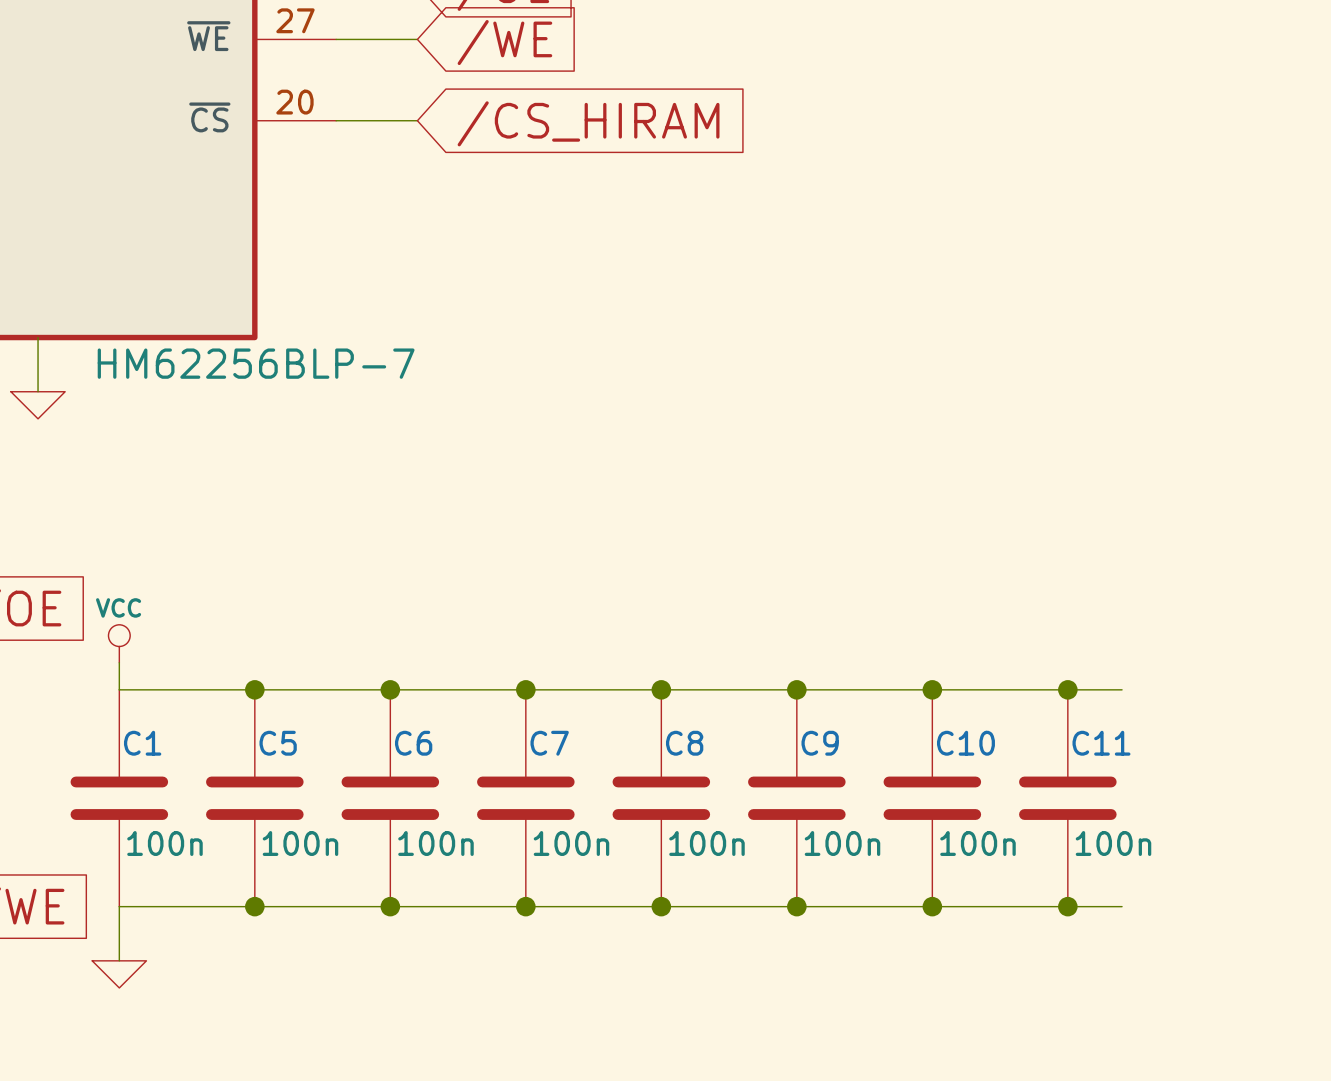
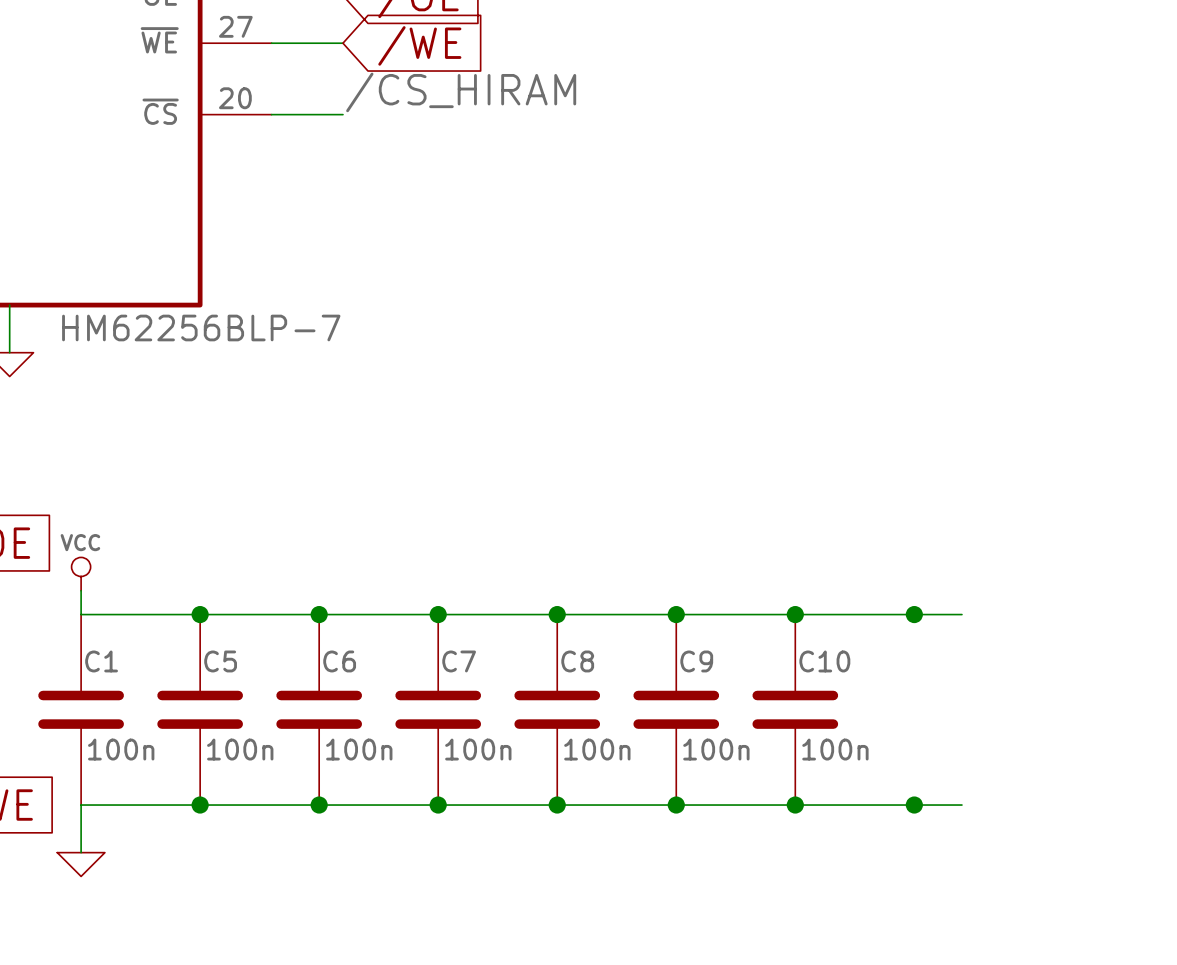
label: none -> /CS_HIRAM (461, 92)
global label: /CS_HIRAM (588, 123) -> none
C11: 100n (1067, 798) -> none

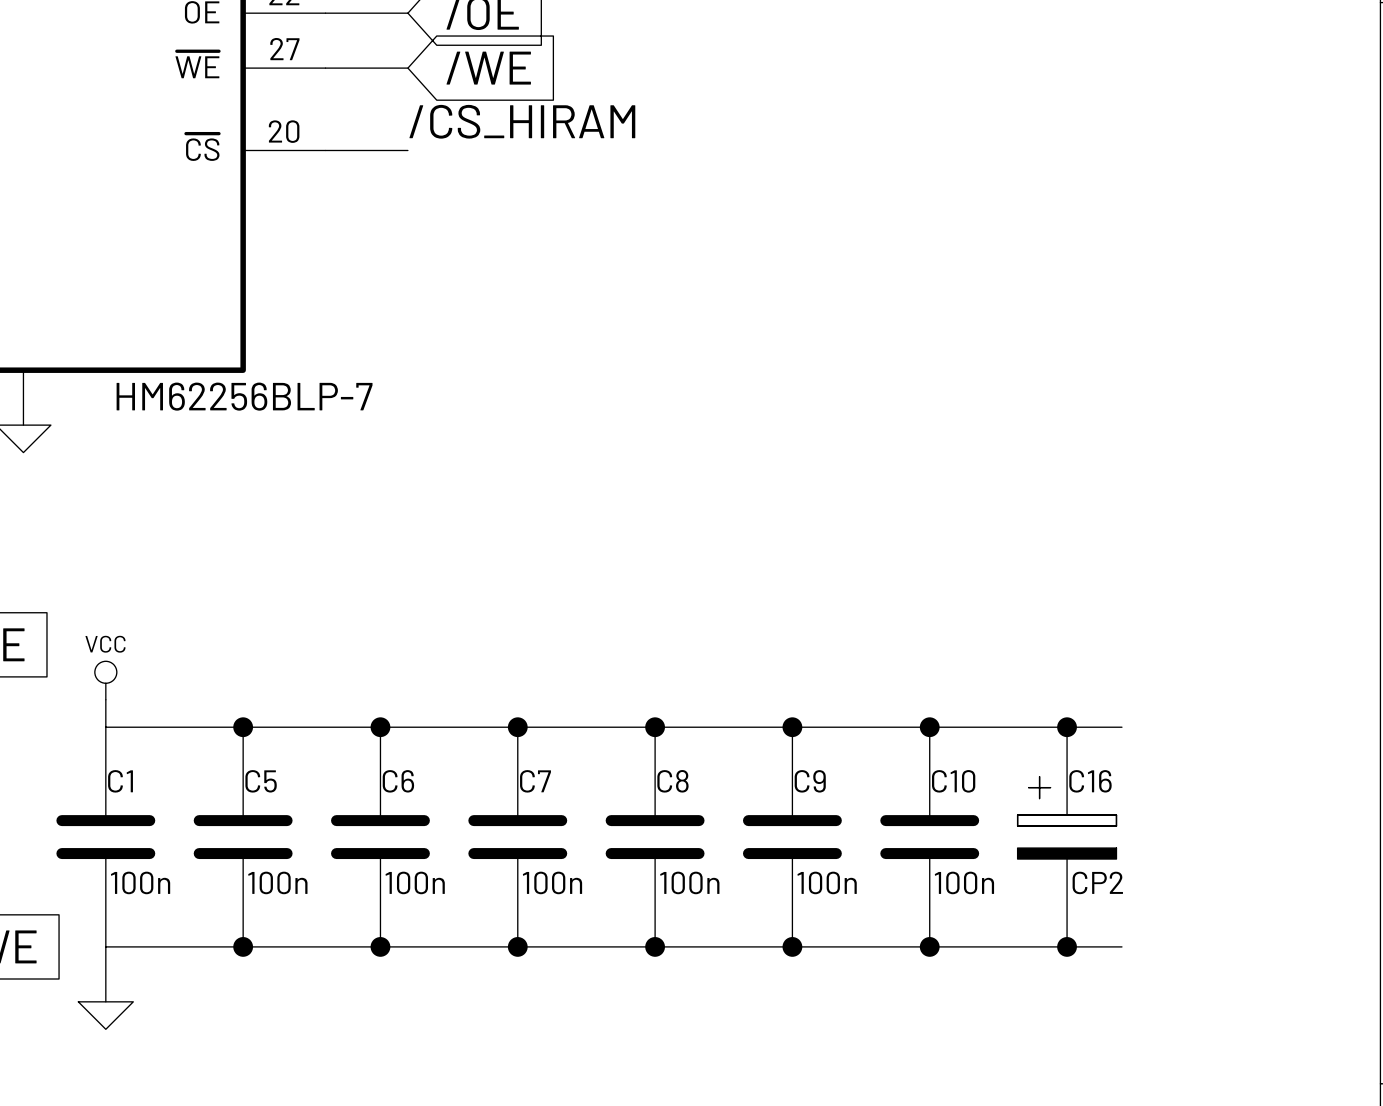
C16: none -> CP2 (1067, 837)

